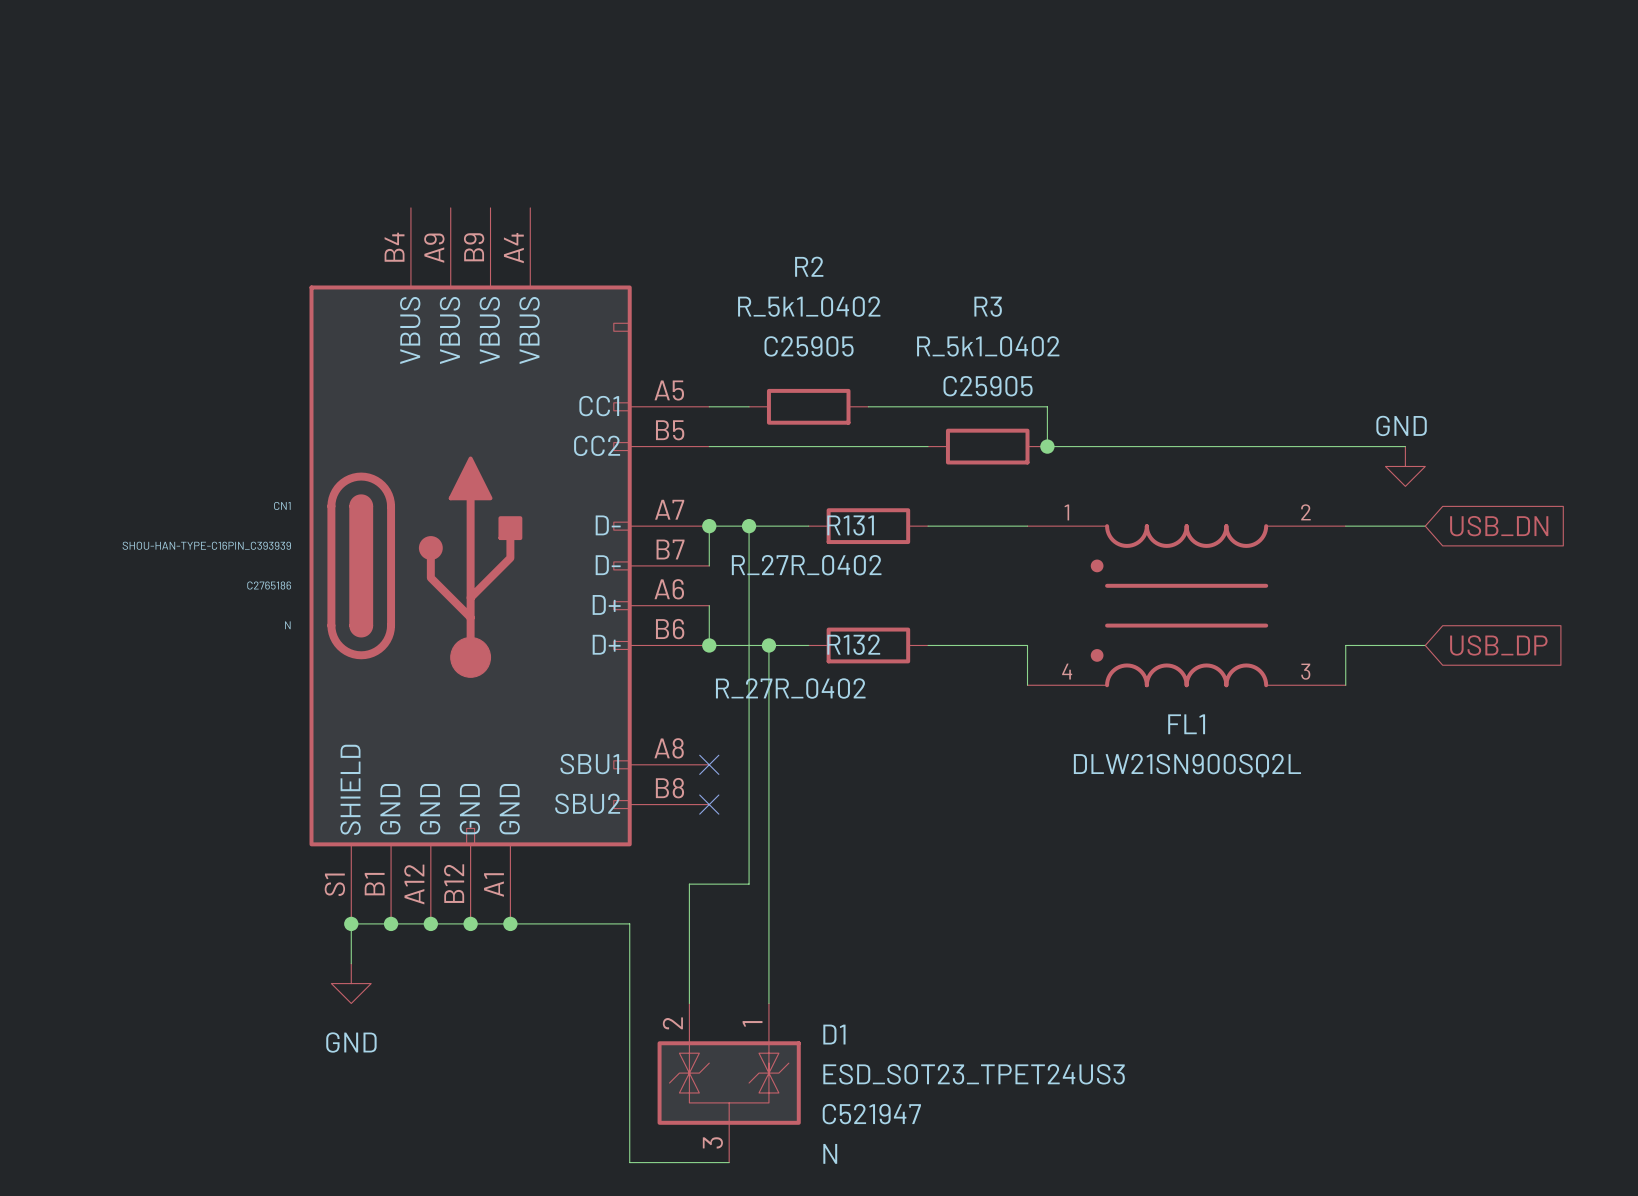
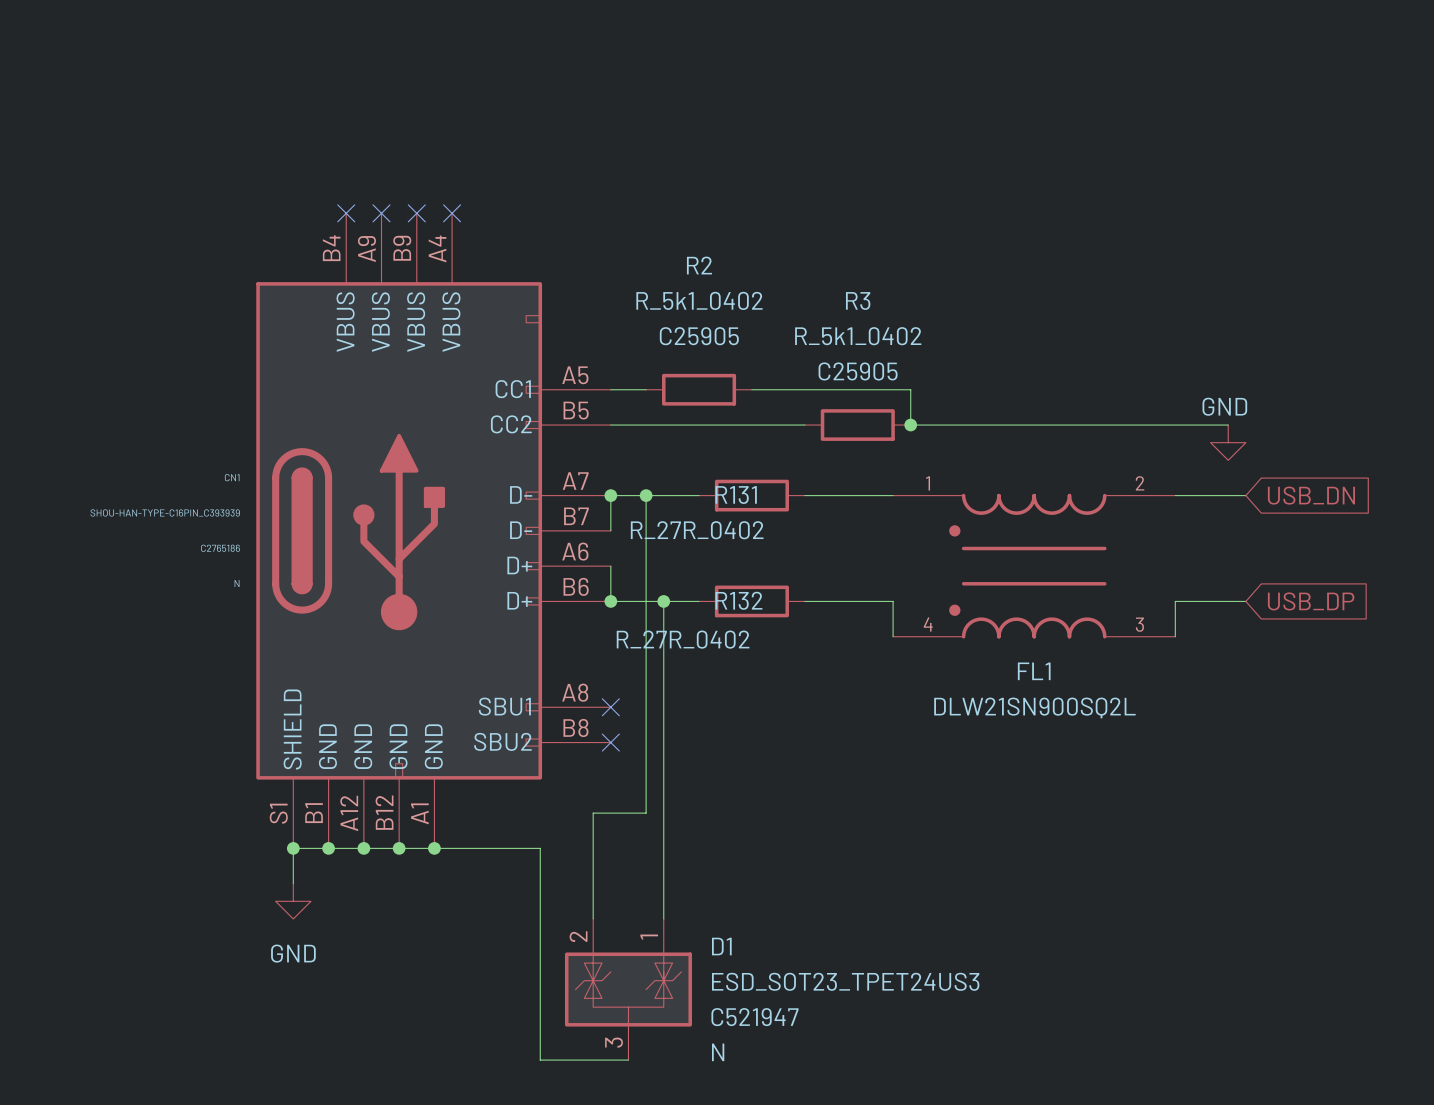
no-connect mark: none -> (346, 213)
no-connect mark: none -> (381, 213)
no-connect mark: none -> (416, 213)
no-connect mark: none -> (452, 213)

